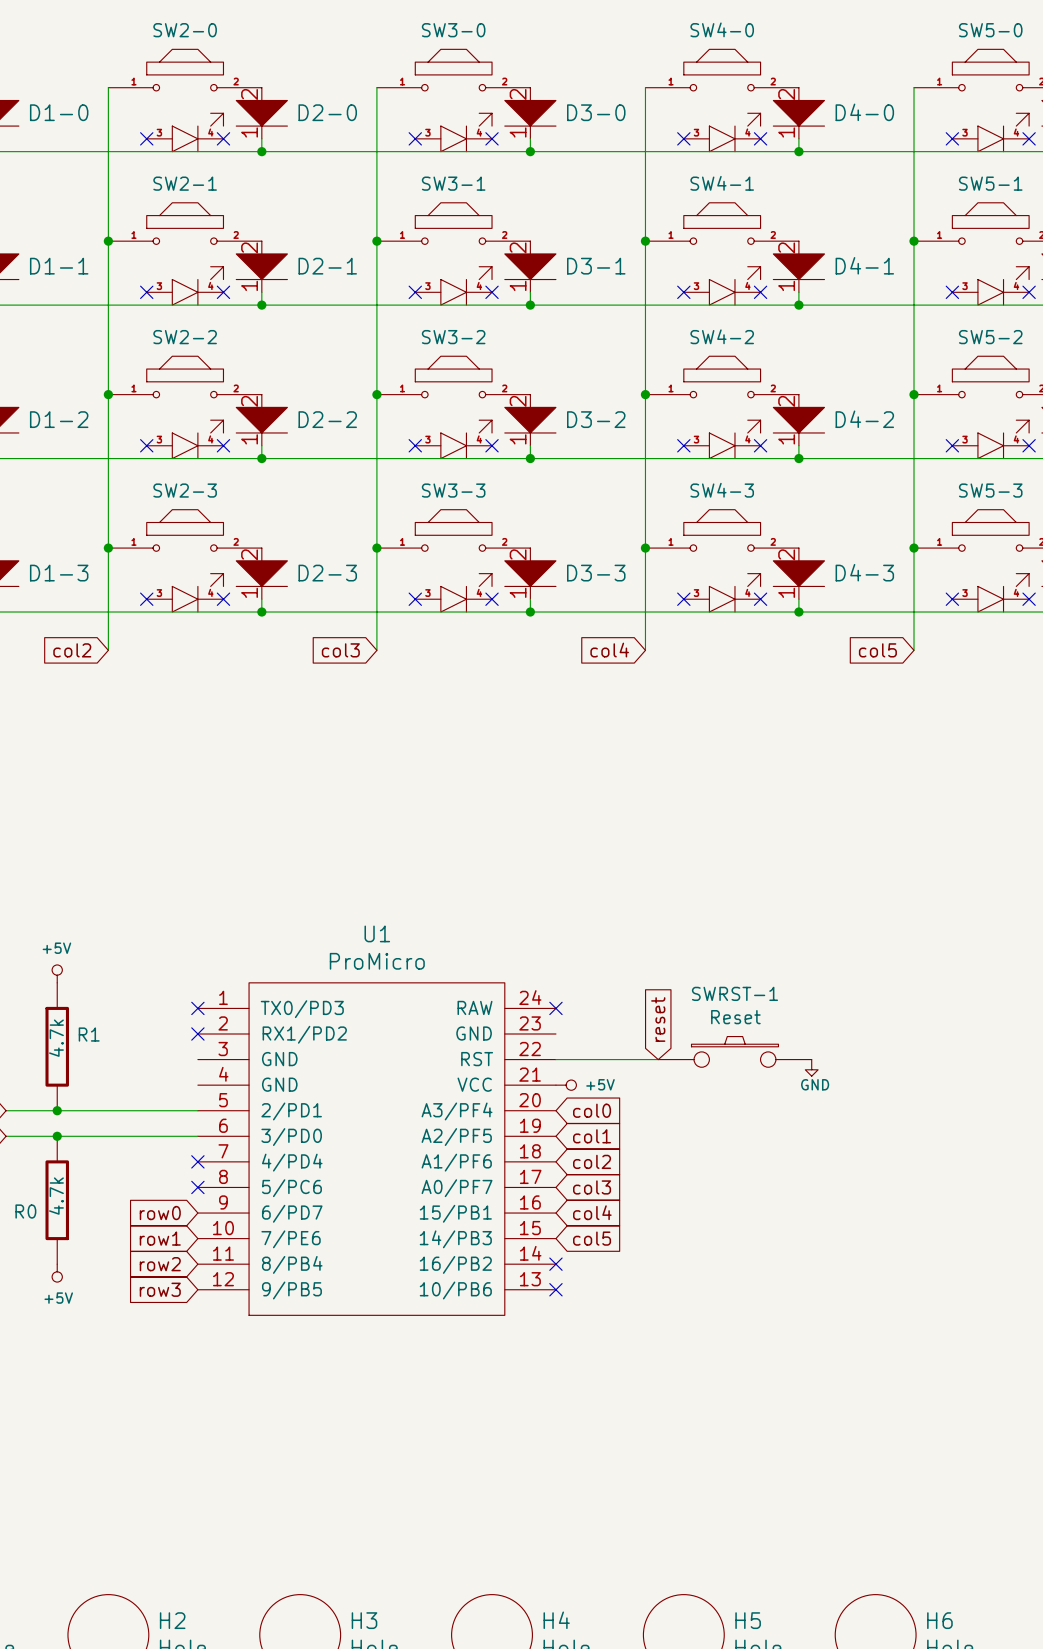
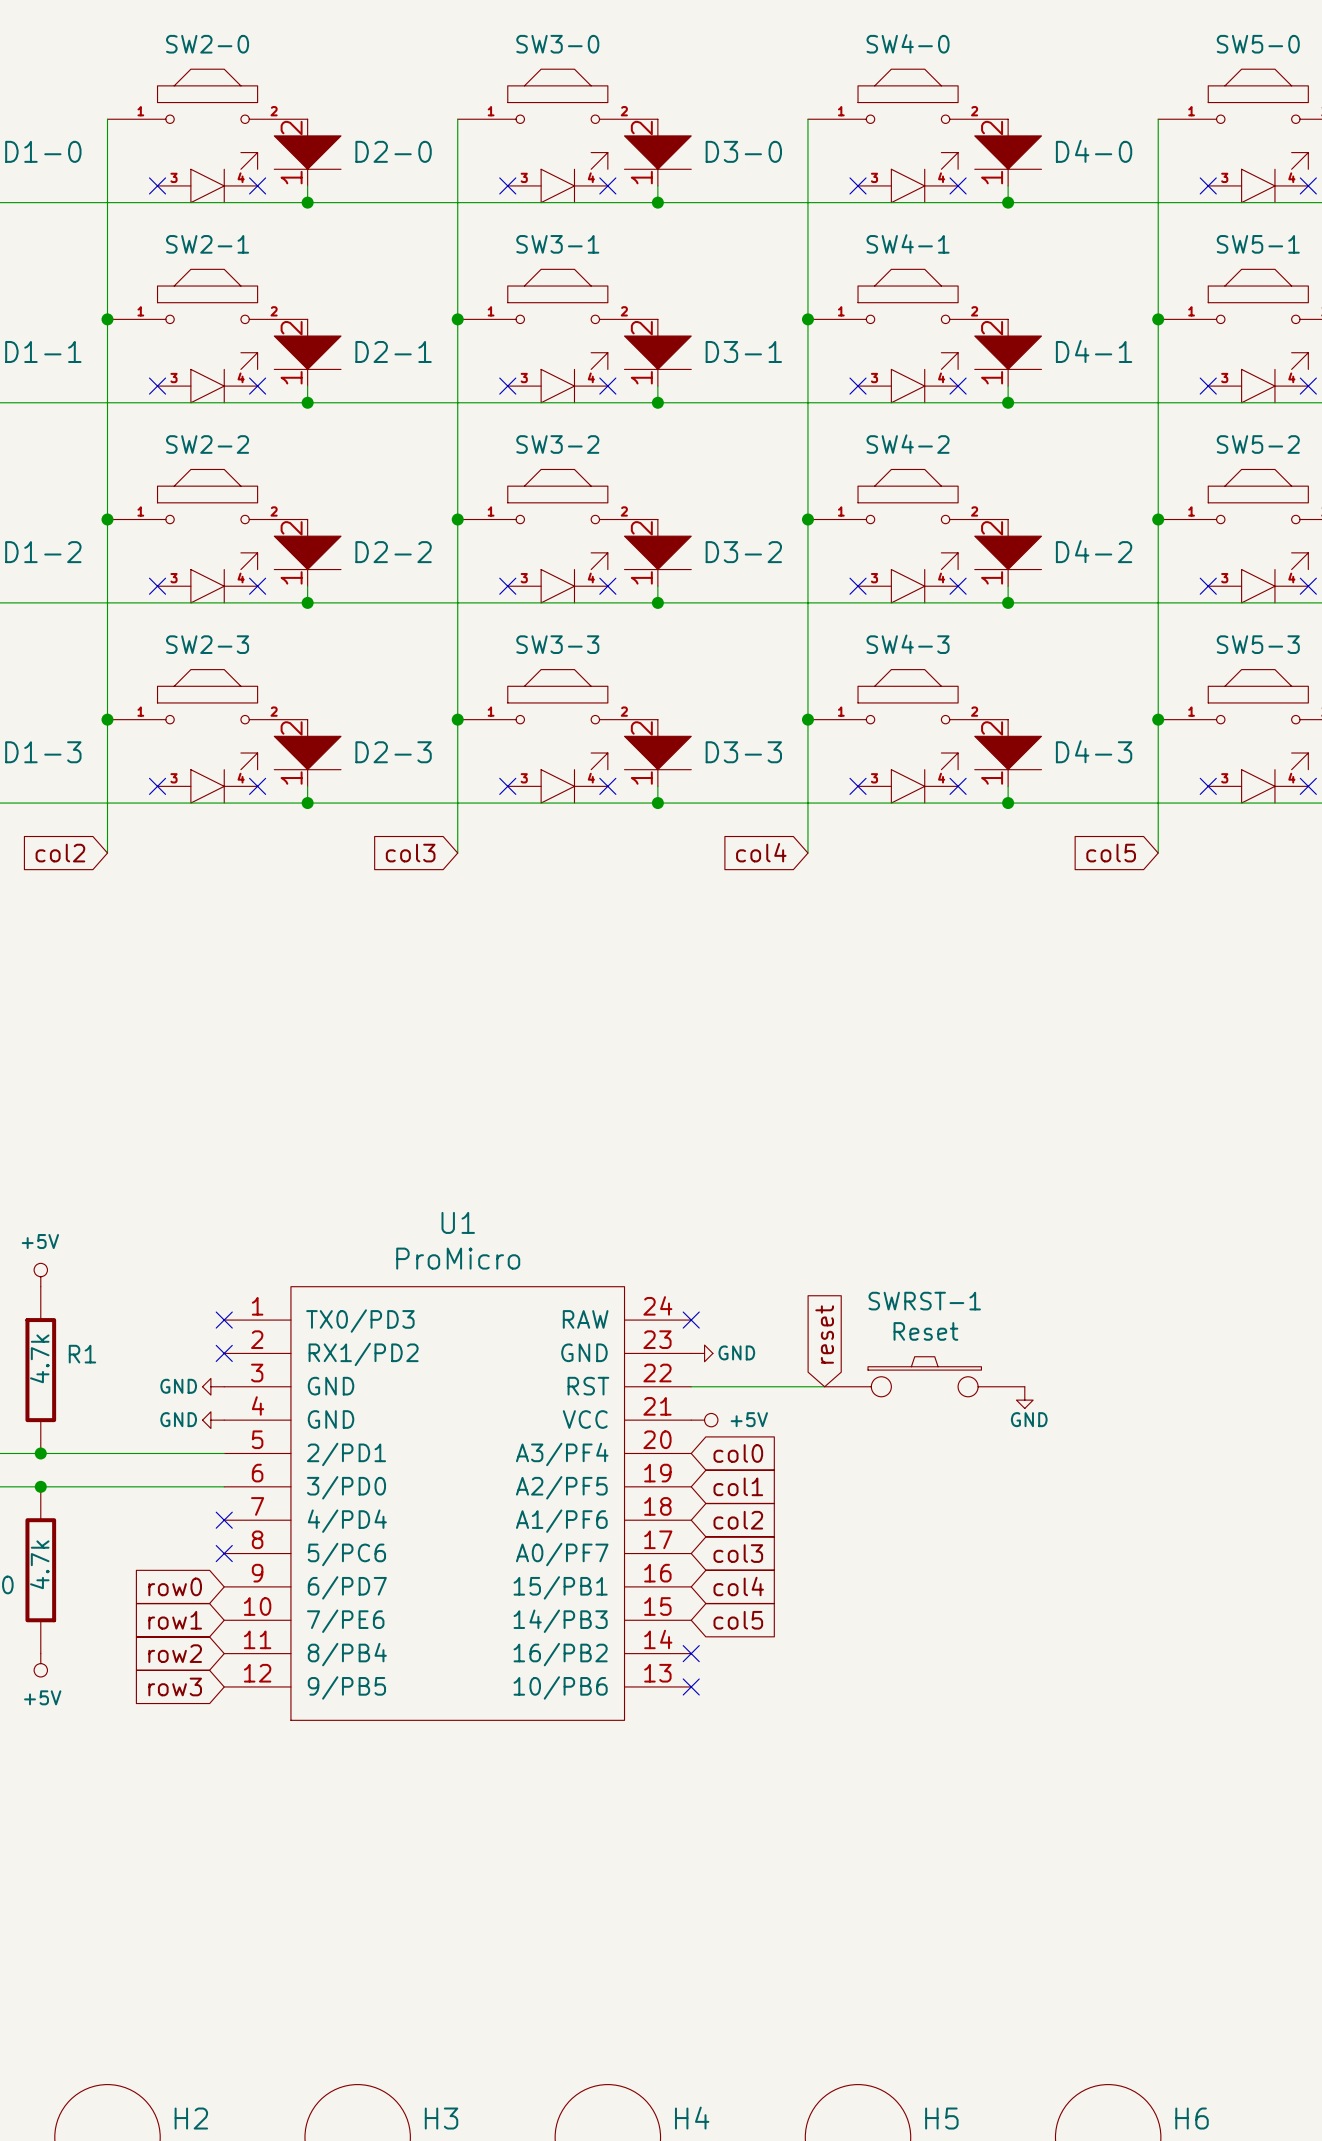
power symbol: none -> GND (702, 1353)
power symbol: none -> GND (213, 1386)
power symbol: none -> GND (213, 1420)

